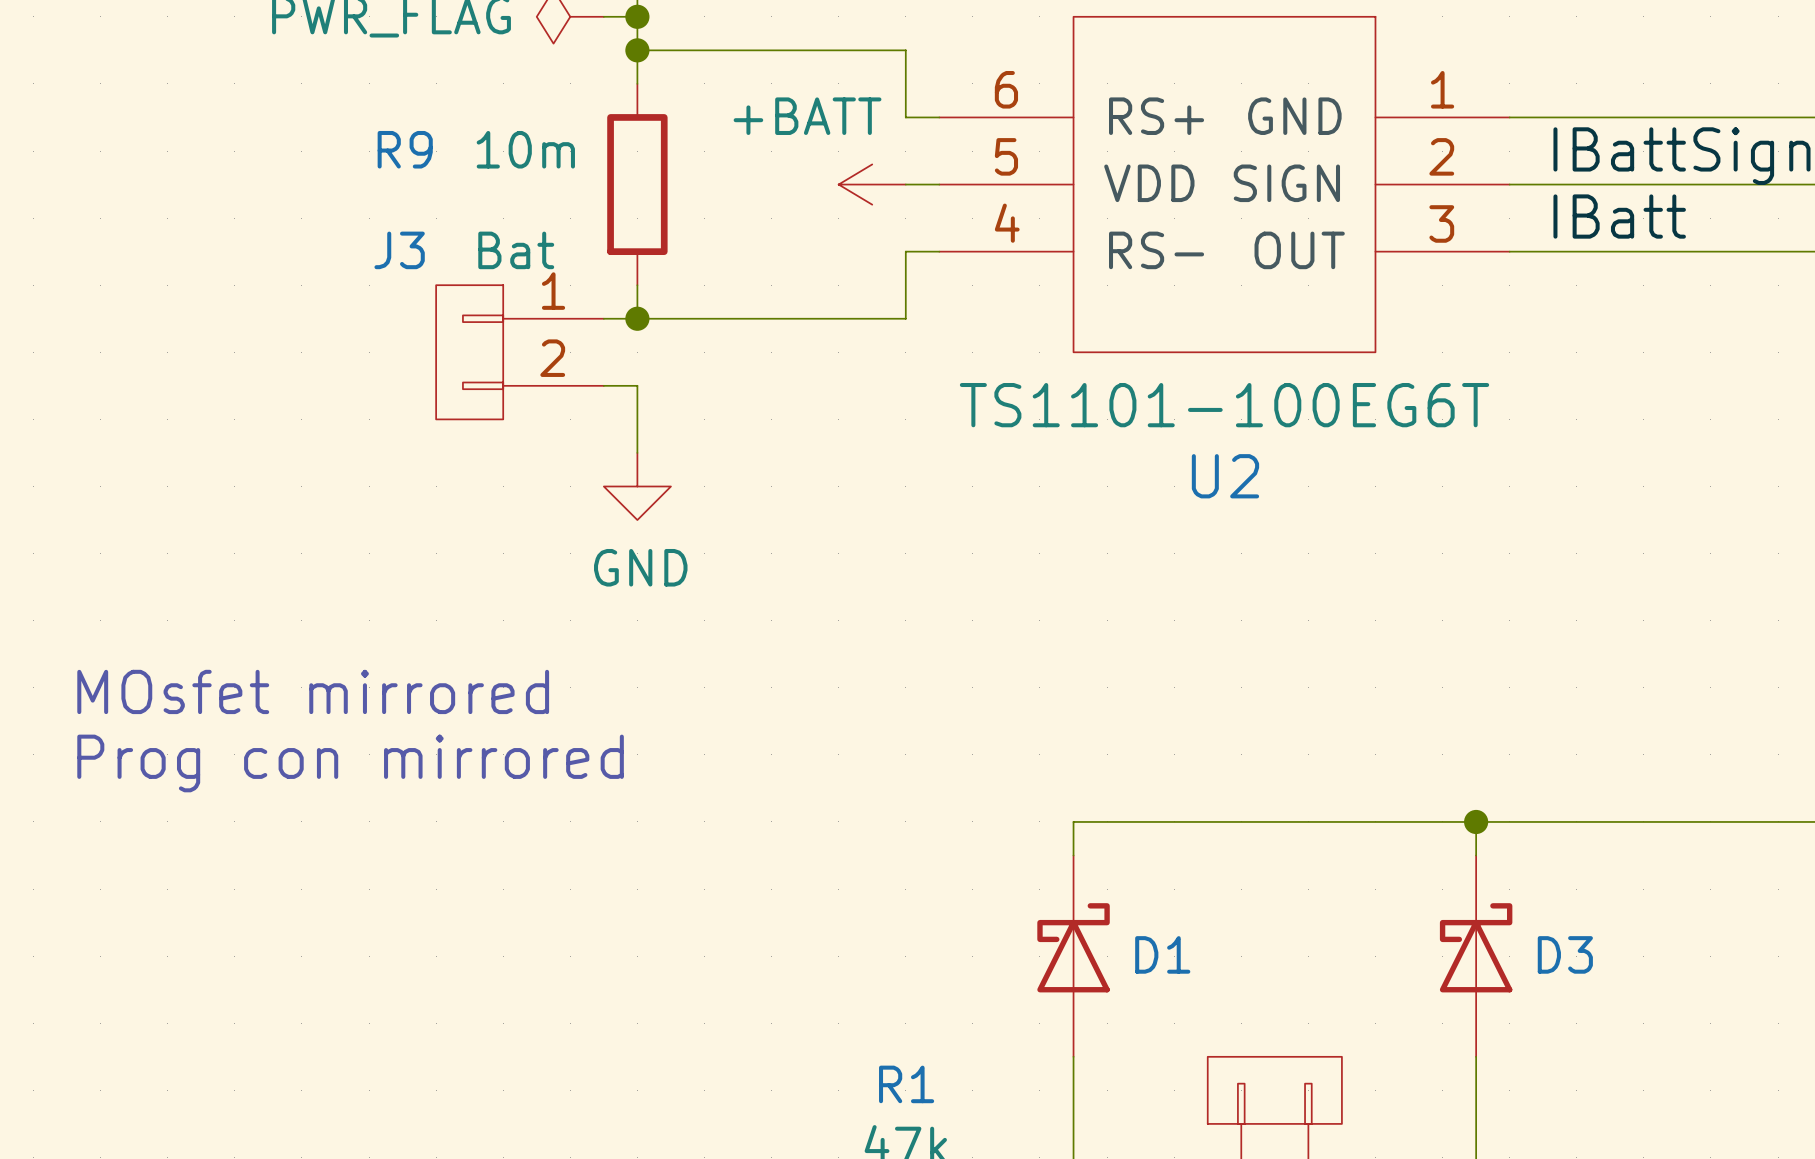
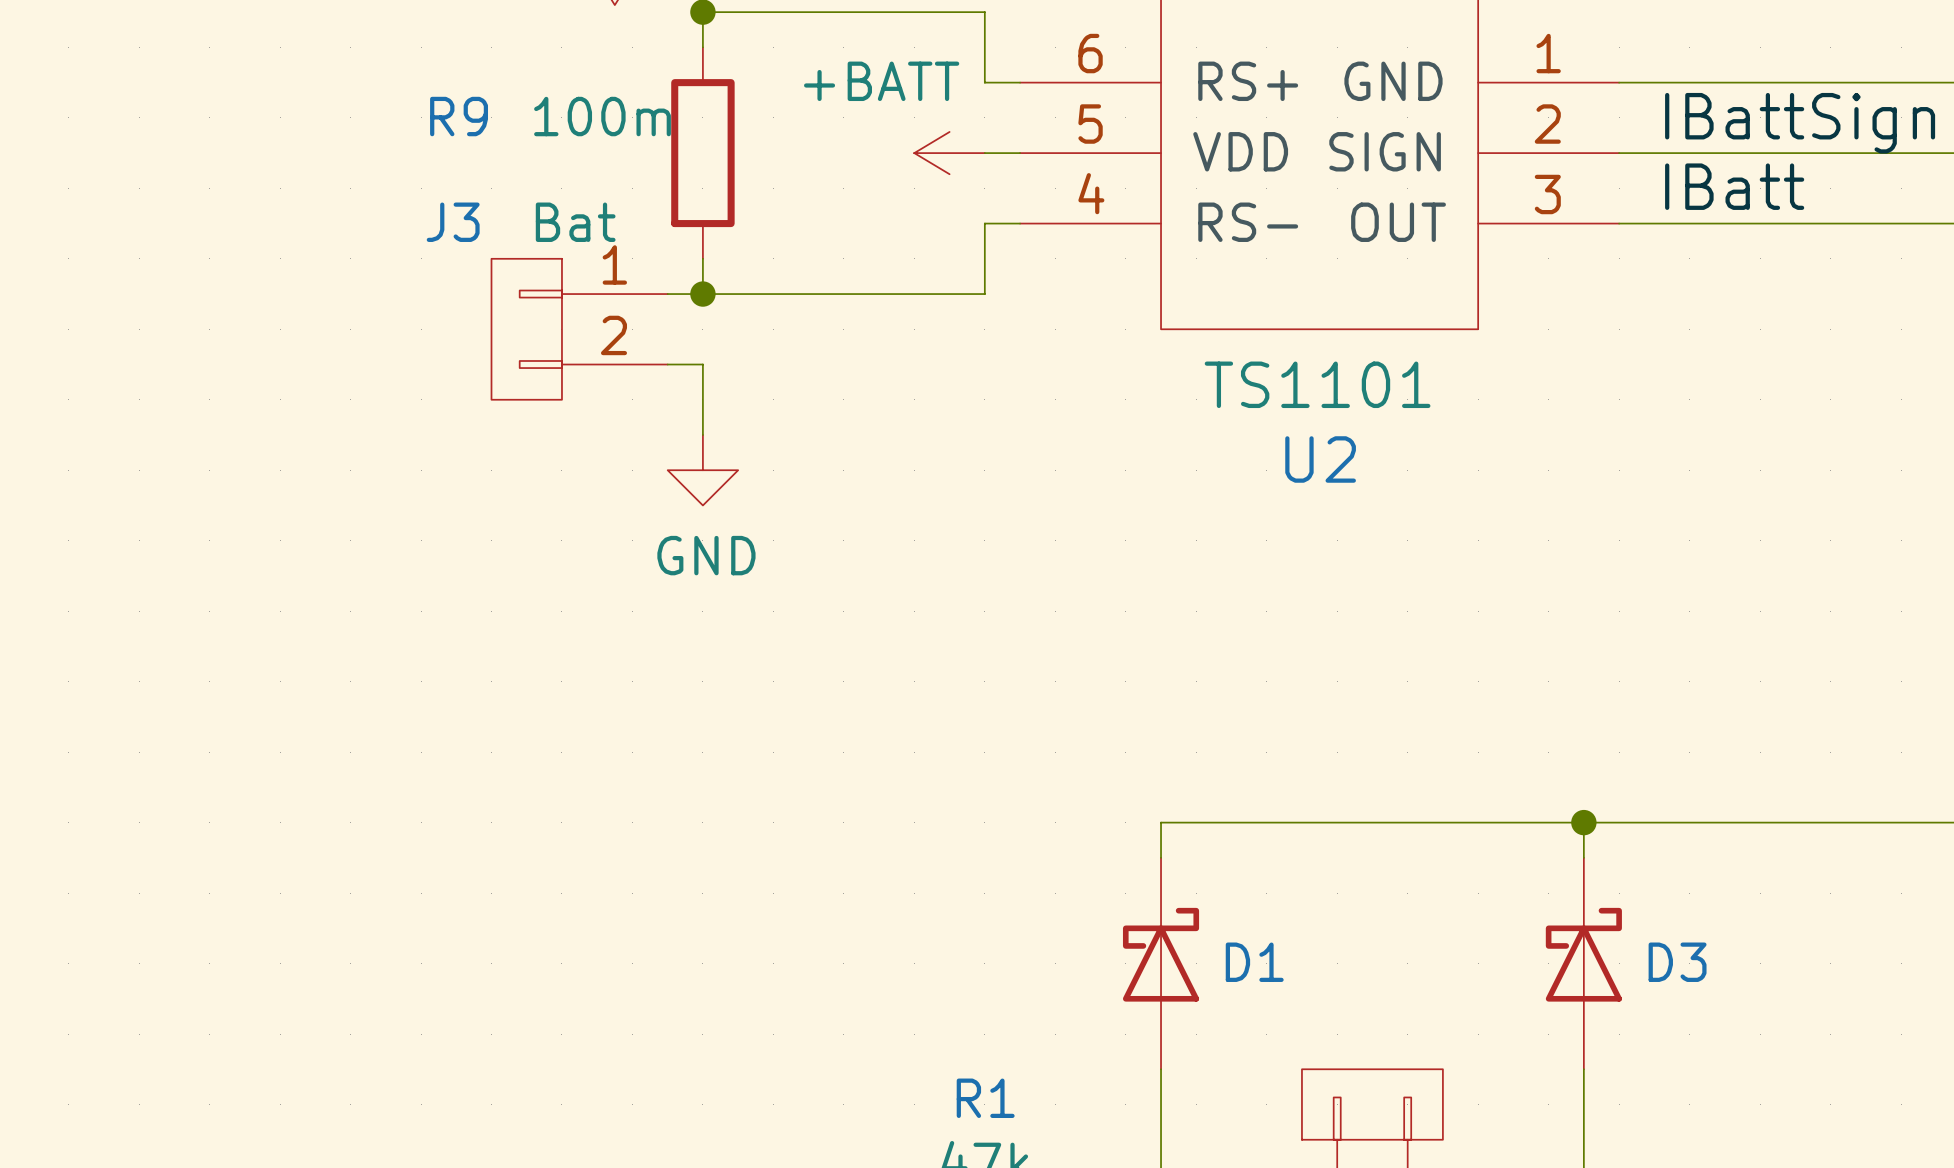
R9 value: 10m (525, 149) -> 100m (602, 116)
U2 value: TS1101-100EG6T (1224, 405) -> TS1101 (1317, 384)
text: MOsfet mirrored (313, 691) -> none
text: Prog con mirrored (350, 763) -> none

